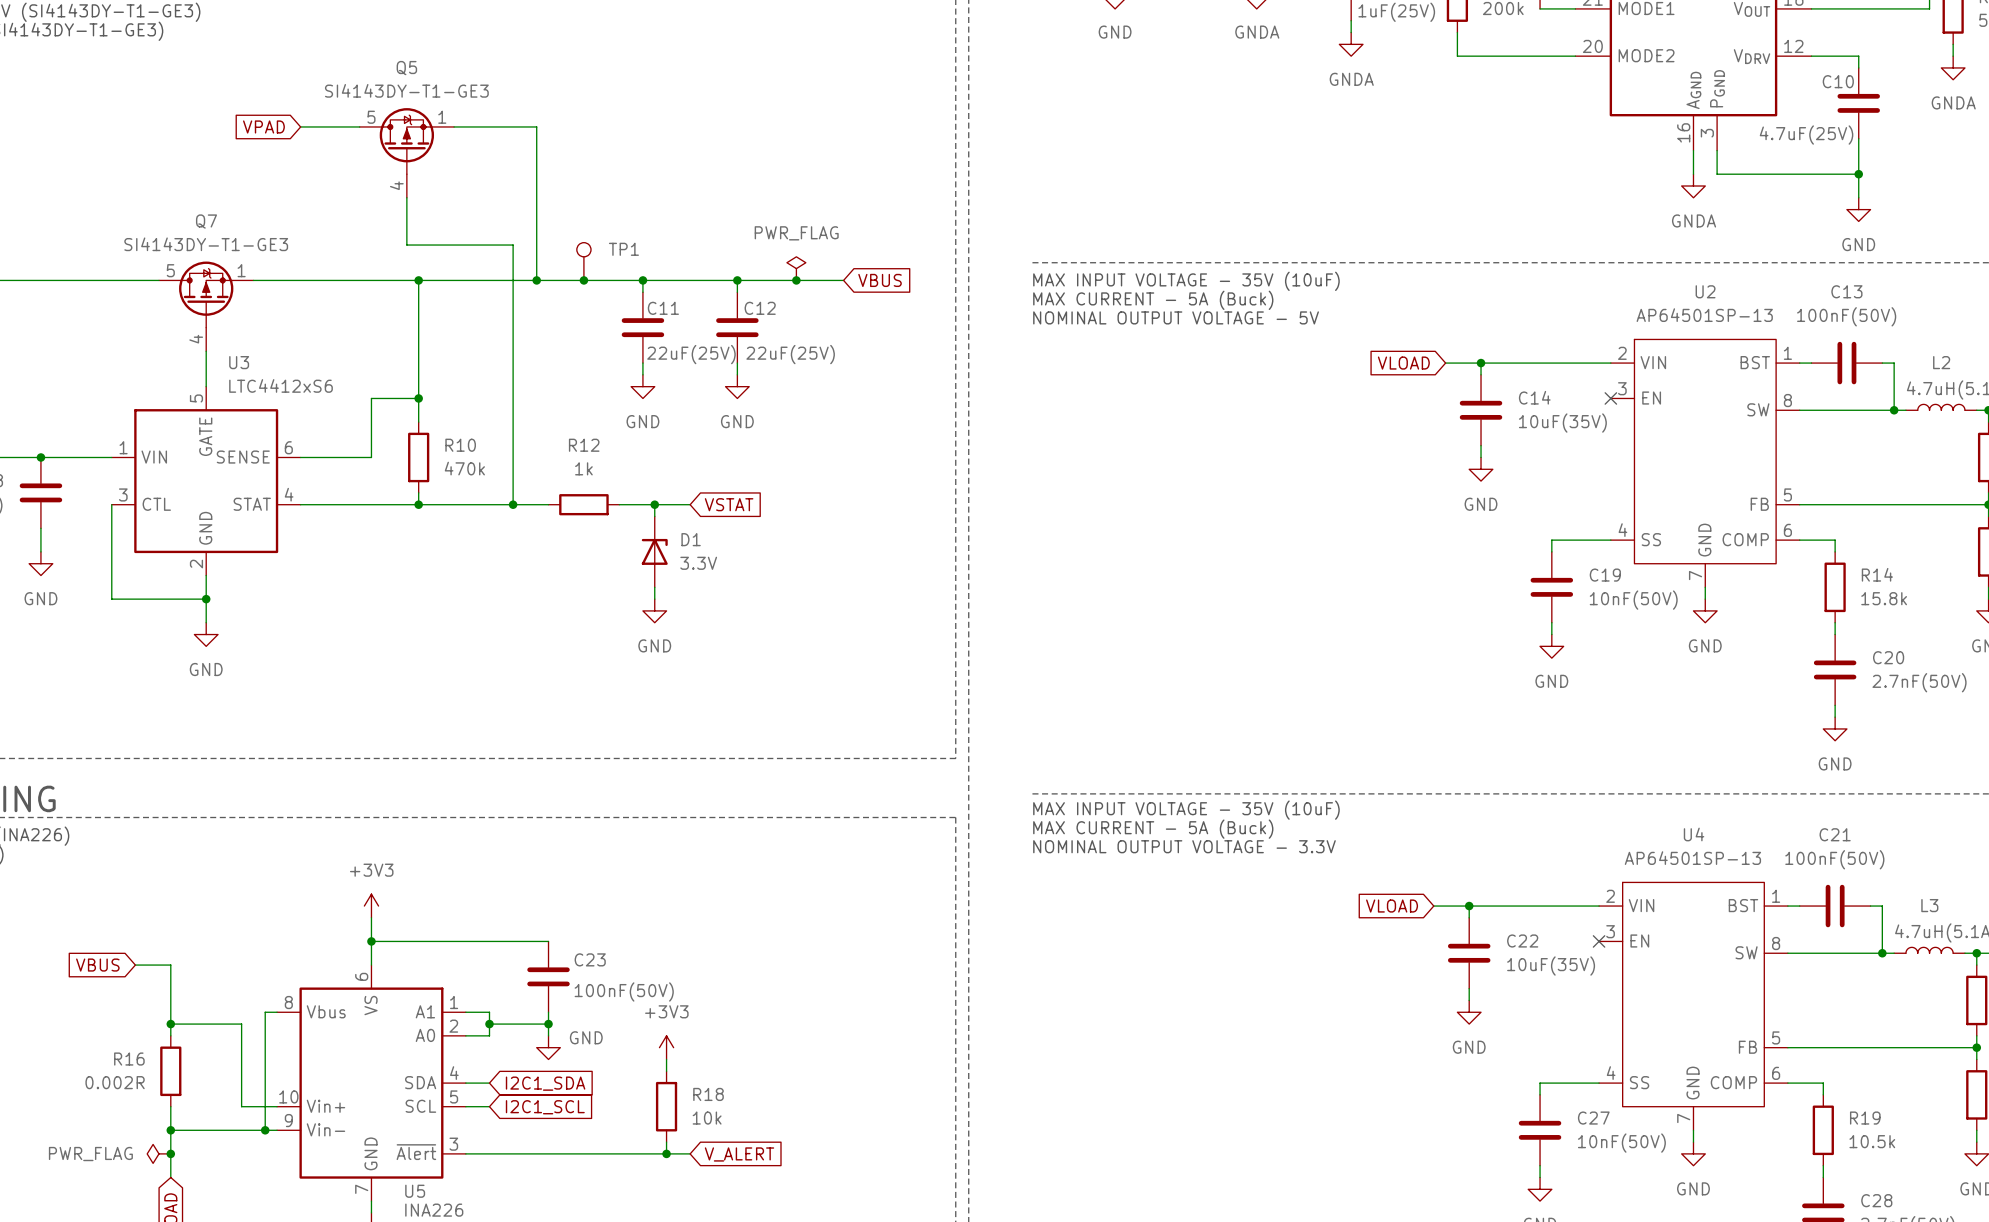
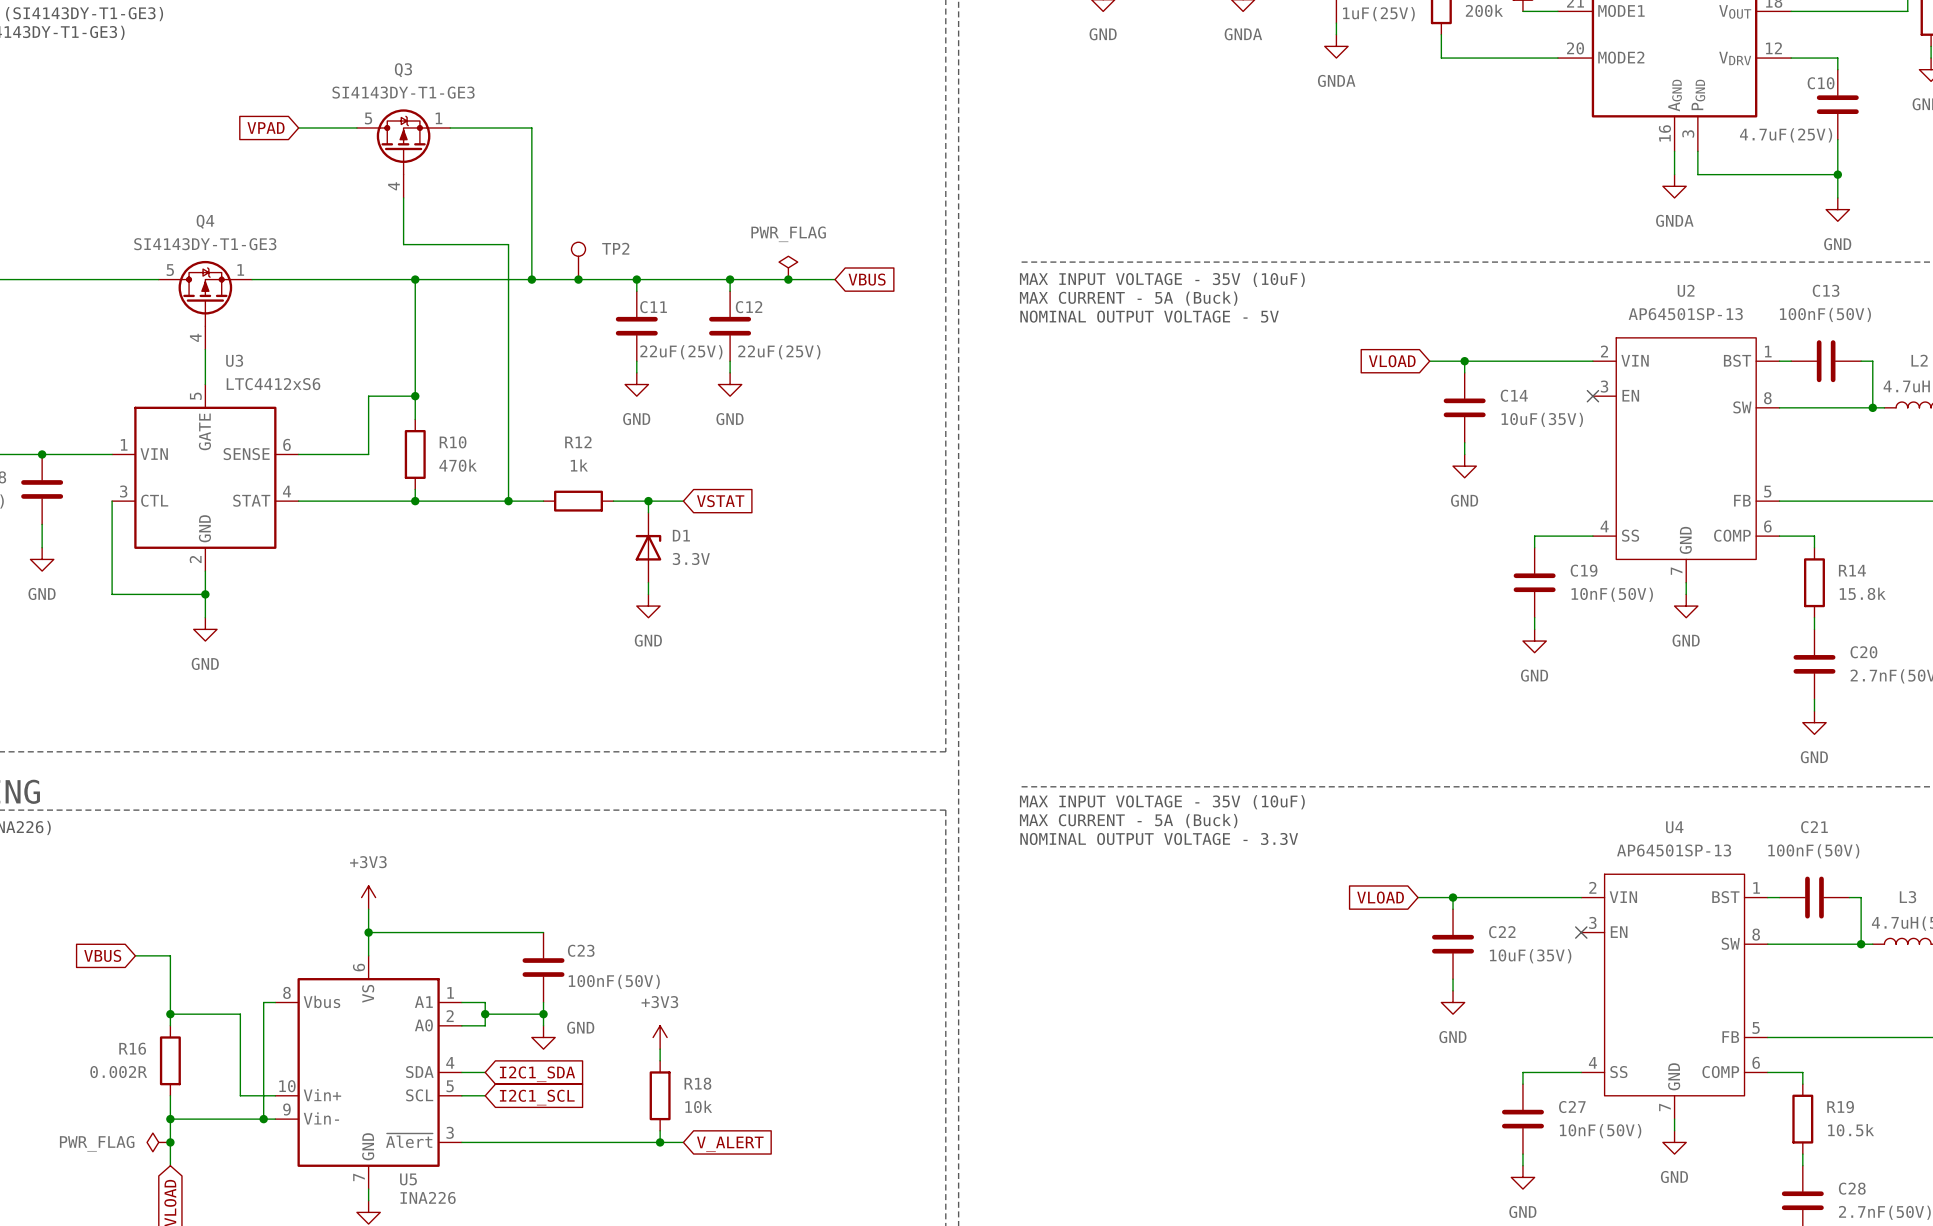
Q5 name: Q5 (406, 68) -> Q3 (403, 70)
Q7 name: Q7 (206, 221) -> Q4 (205, 221)
TP1 name: TP1 (623, 249) -> TP2 (615, 248)

